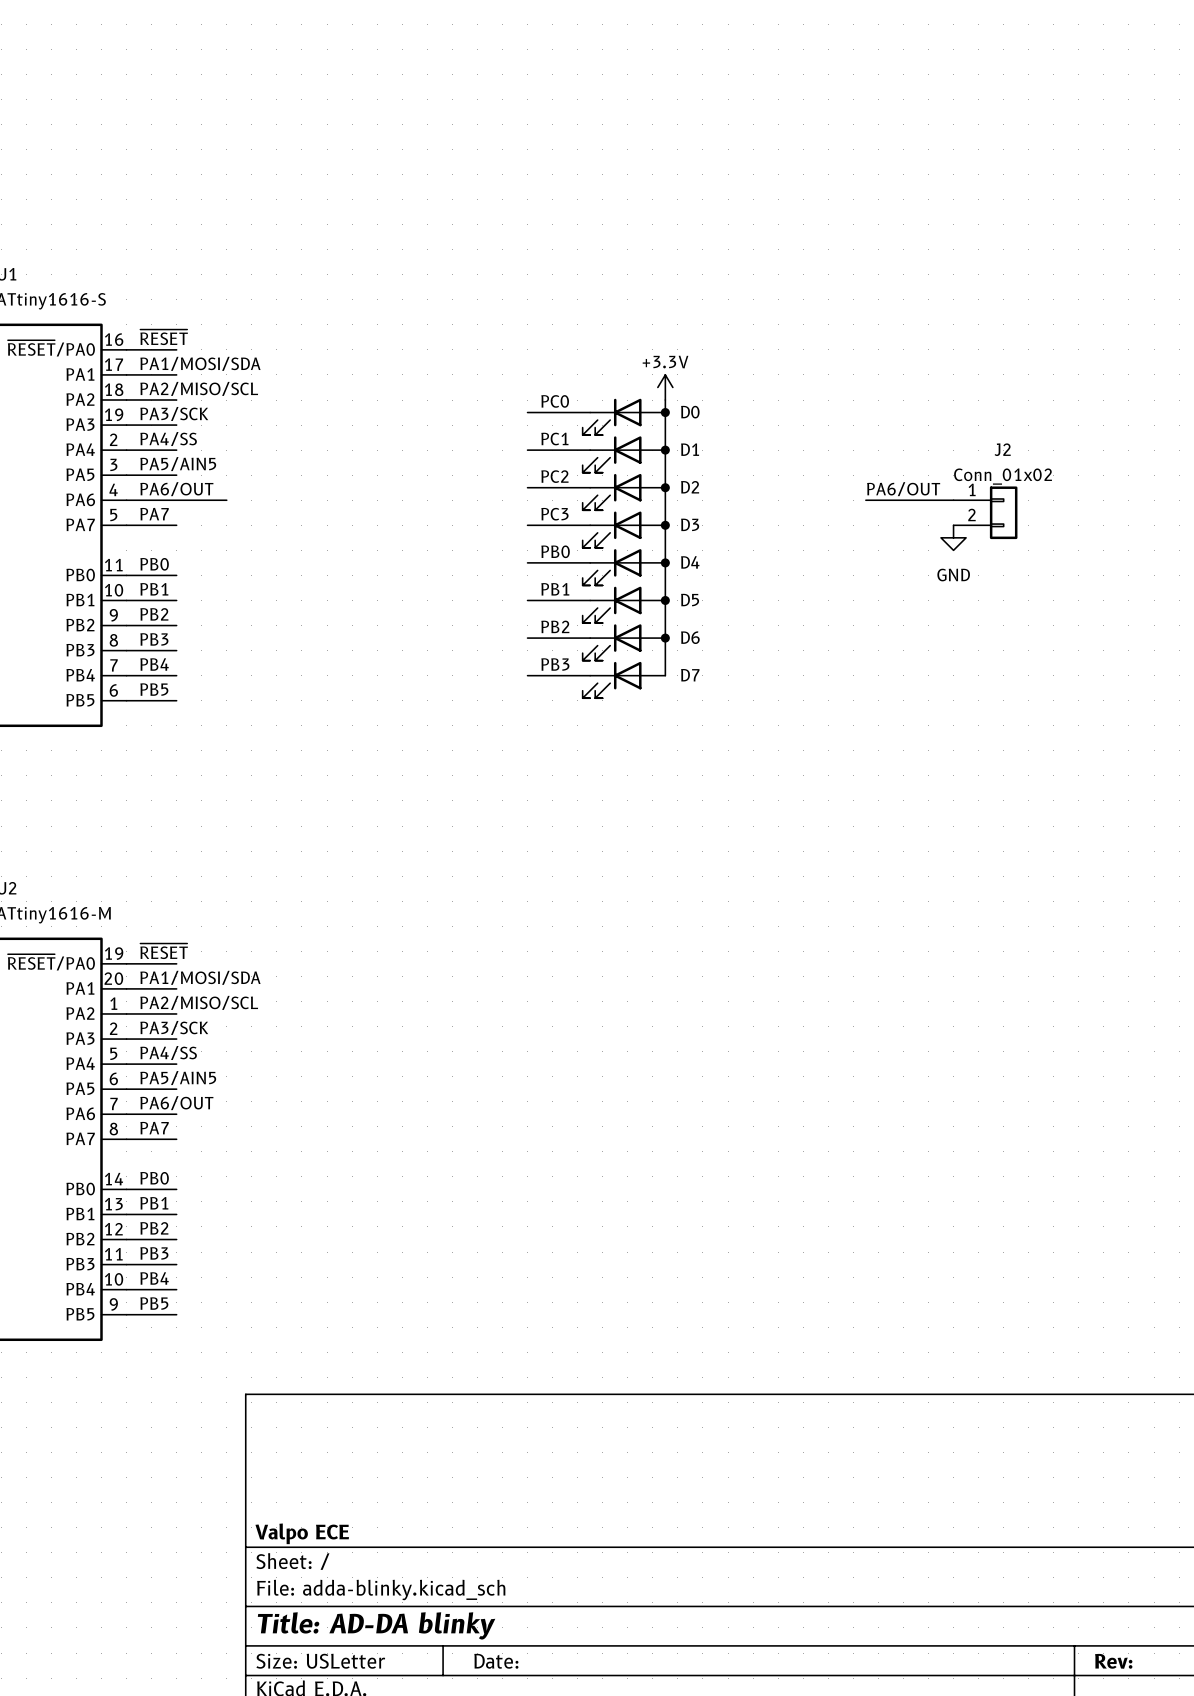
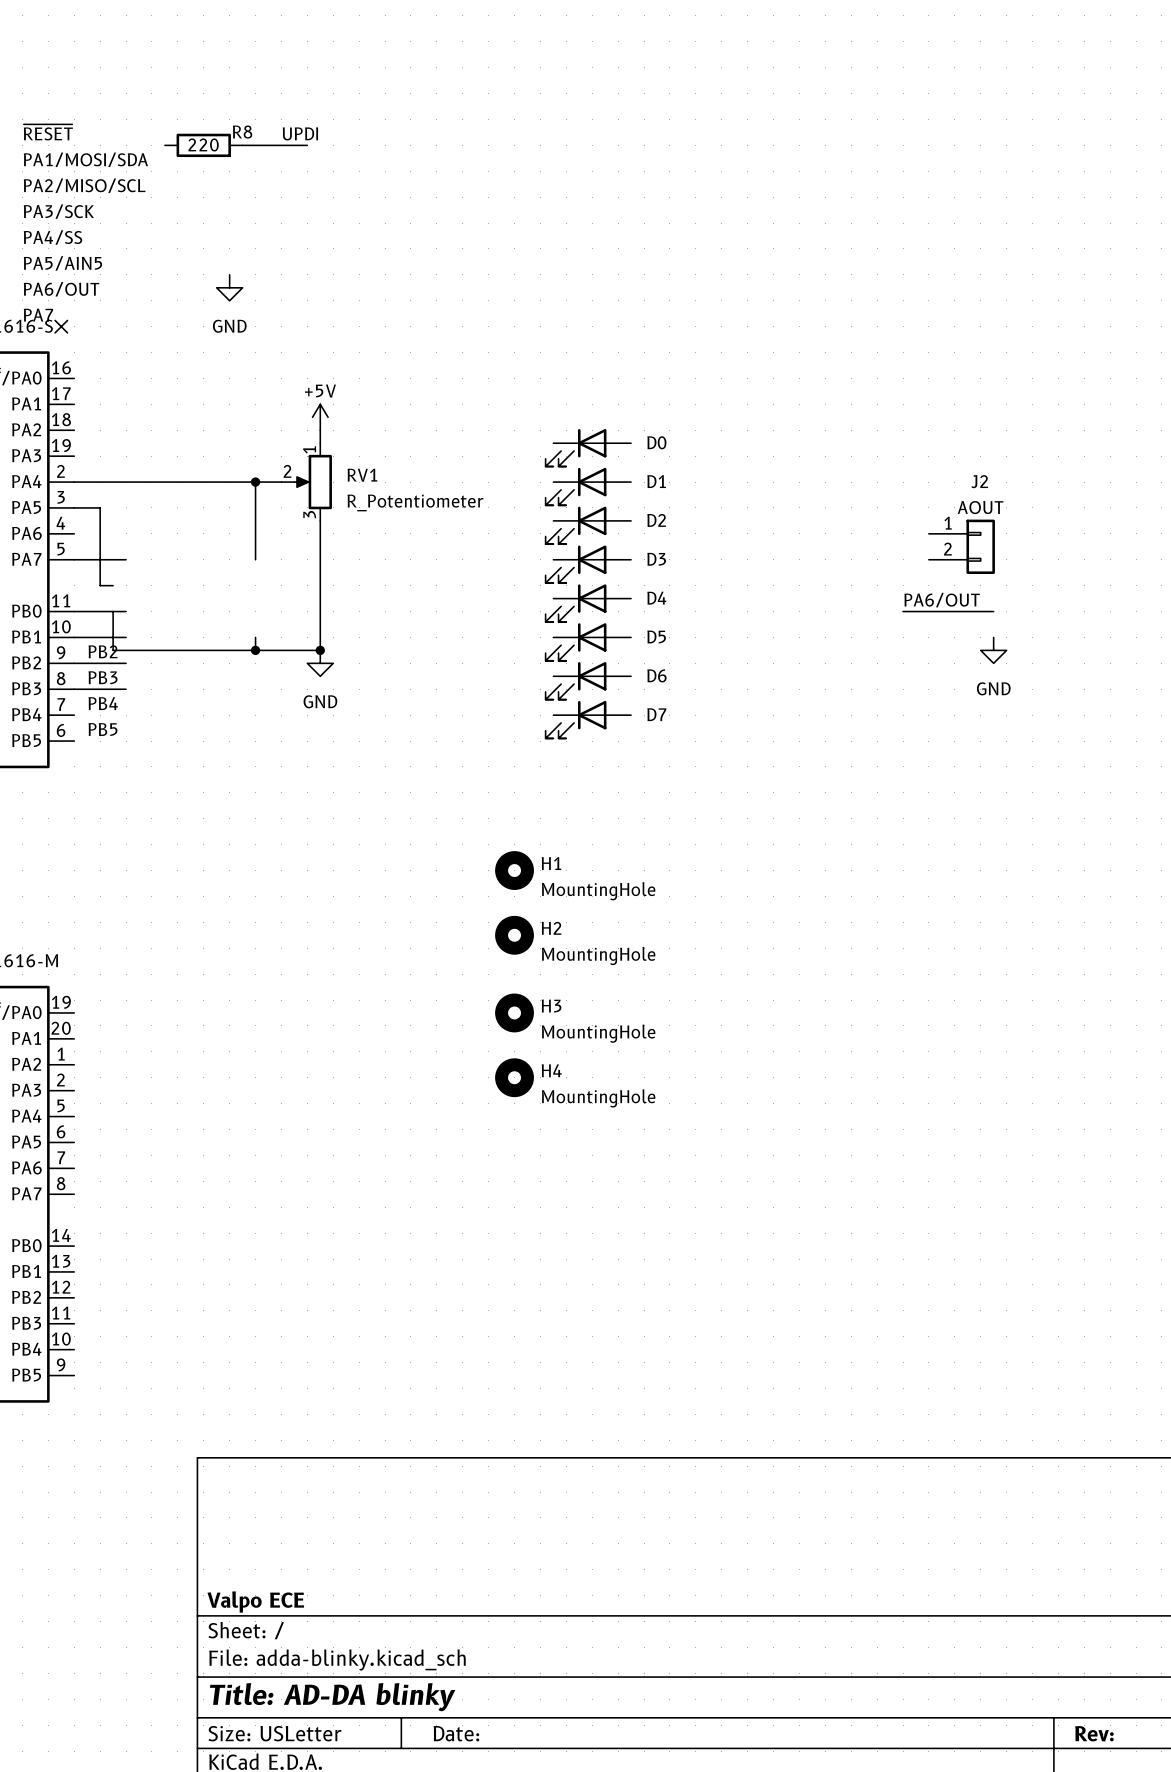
label: none -> UPDI (300, 133)
R8: none -> 220 (203, 145)
wire: none -> (242, 145) (307, 145)
power symbol: none -> GND (229, 287)
no-connect mark: none -> (61, 326)
label position: ~{RESET} (164, 337) -> ~{RESET} (48, 132)
wire: (126, 349) (176, 349) -> none
label position: PA1/MOSI/SDA (200, 363) -> PA1/MOSI/SDA (85, 159)
wire: (126, 374) (176, 374) -> none
power symbol: none -> +5V (320, 417)
power symbol: +3.3V (665, 387) -> none
label position: PA2/MISO/SCL (199, 388) -> PA2/MISO/SCL (84, 185)
wire: (126, 400) (176, 400) -> none
wire: none -> (320, 430) (320, 443)
wire: (665, 400) (665, 675) -> none
label: PC0 (555, 401) -> none
wire: (527, 412) (590, 412) -> none
junction: (665, 412) -> none
label position: PA3/SCK (174, 413) -> PA3/SCK (58, 211)
wire: (126, 425) (176, 425) -> none
label position: PA4/SS (168, 439) -> PA4/SS (52, 237)
label: PC1 (554, 439) -> none
wire: none -> (126, 482) (281, 482)
wire: none -> (255, 482) (255, 559)
junction: none -> (255, 482)
RV1: none -> R_Potentiometer (306, 482)
wire: (527, 450) (590, 450) -> none
junction: (665, 450) -> none
label position: PA5/AIN5 (178, 464) -> PA5/AIN5 (62, 263)
wire: (151, 475) (176, 475) -> (100, 507) (100, 585) (113, 585)
label: PC2 (554, 476) -> none
J2 value: Conn_01x02 (1003, 476) -> AOUT (980, 507)
wire: none -> (320, 520) (320, 650) (113, 650) (113, 611)
wire: (527, 487) (590, 487) -> none
junction: (665, 487) -> none
label position: PA6/OUT (176, 489) -> PA6/OUT (61, 289)
label position: PA6/OUT (903, 489) -> PA6/OUT (942, 600)
wire: (126, 500) (226, 500) -> none
wire: (865, 500) (953, 500) -> (903, 611) (993, 611)
label position: PA7 (154, 514) -> PA7 (38, 315)
label: PC3 (554, 514) -> none
wire: (527, 525) (590, 525) -> none
junction: (665, 525) -> none
power symbol position: GND (953, 537) -> GND (993, 650)
label: PB0 (555, 551) -> none
wire: (527, 562) (590, 562) -> none
junction: (665, 562) -> none
label: PB0 (154, 564) -> none
label: PB1 (154, 589) -> none
label: PB1 (555, 589) -> none
wire: none -> (255, 637) (255, 650)
wire: (527, 600) (590, 600) -> none
junction: (665, 600) -> none
junction: none -> (255, 650)
junction: none -> (320, 650)
power symbol: none -> GND (320, 663)
label: PB2 (555, 626) -> none
wire: (527, 638) (590, 638) -> none
junction: (665, 638) -> none
label: PB3 (555, 664) -> none
wire: (126, 675) (176, 675) -> none
wire: (527, 675) (590, 675) -> none
wire: (126, 700) (176, 700) -> none
H1: none -> MountingHole (514, 870)
H2: none -> MountingHole (514, 935)
label: ~{RESET} (164, 951) -> none
wire: (126, 963) (176, 963) -> none
H3: none -> MountingHole (514, 1012)
label: PA1/MOSI/SDA (200, 977) -> none
wire: (126, 988) (176, 988) -> none
label: PA2/MISO/SCL (199, 1002) -> none
wire: (126, 1013) (176, 1013) -> none
H4: none -> MountingHole (514, 1077)
label: PA3/SCK (174, 1027) -> none
wire: (126, 1039) (176, 1039) -> none
label: PA4/SS (168, 1053) -> none
wire: (126, 1064) (176, 1064) -> none
label: PA5/AIN5 (178, 1078) -> none
wire: (126, 1089) (176, 1089) -> none
label: PA6/OUT (176, 1103) -> none
wire: (126, 1114) (176, 1114) -> none
label: PA7 (154, 1128) -> none
wire: (126, 1139) (176, 1139) -> none
label: PB0 (154, 1178) -> none
wire: (126, 1189) (176, 1189) -> none
label: PB1 (154, 1203) -> none
wire: (126, 1214) (176, 1214) -> none
label: PB2 (154, 1228) -> none
wire: (126, 1239) (176, 1239) -> none
label: PB3 (154, 1253) -> none
wire: (126, 1264) (176, 1264) -> none
label: PB4 (154, 1278) -> none
wire: (126, 1289) (176, 1289) -> none
label: PB5 (154, 1303) -> none
wire: (126, 1314) (176, 1314) -> none

